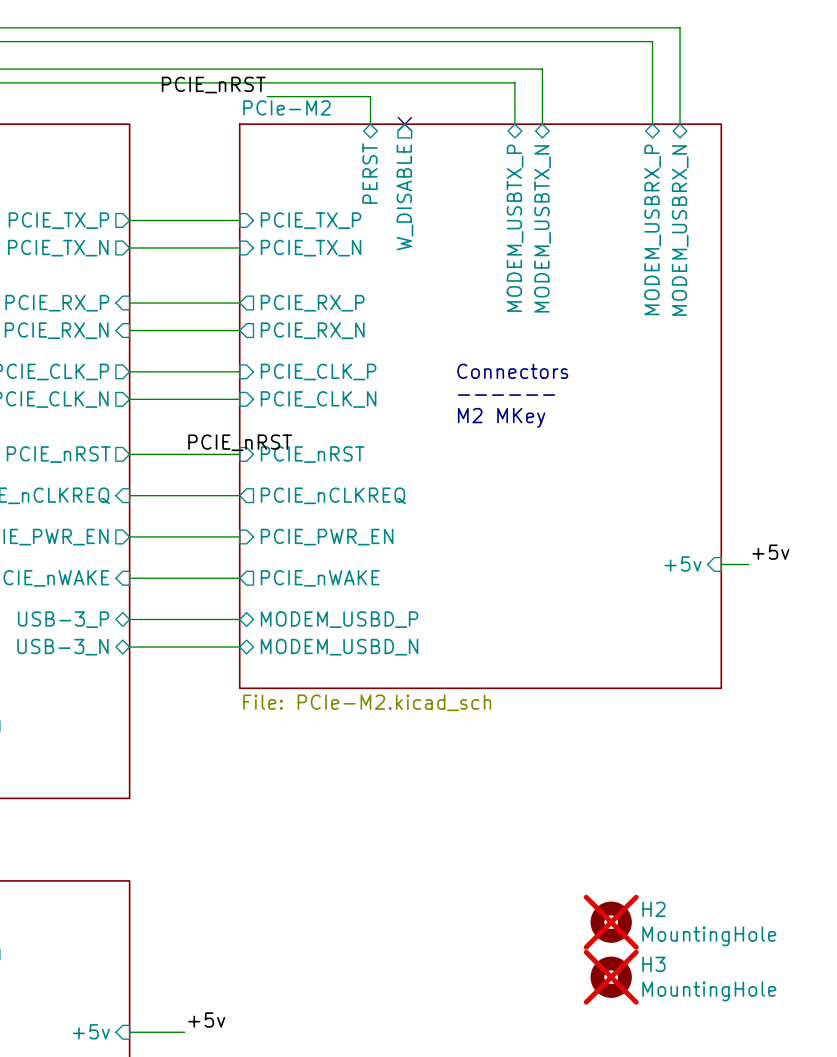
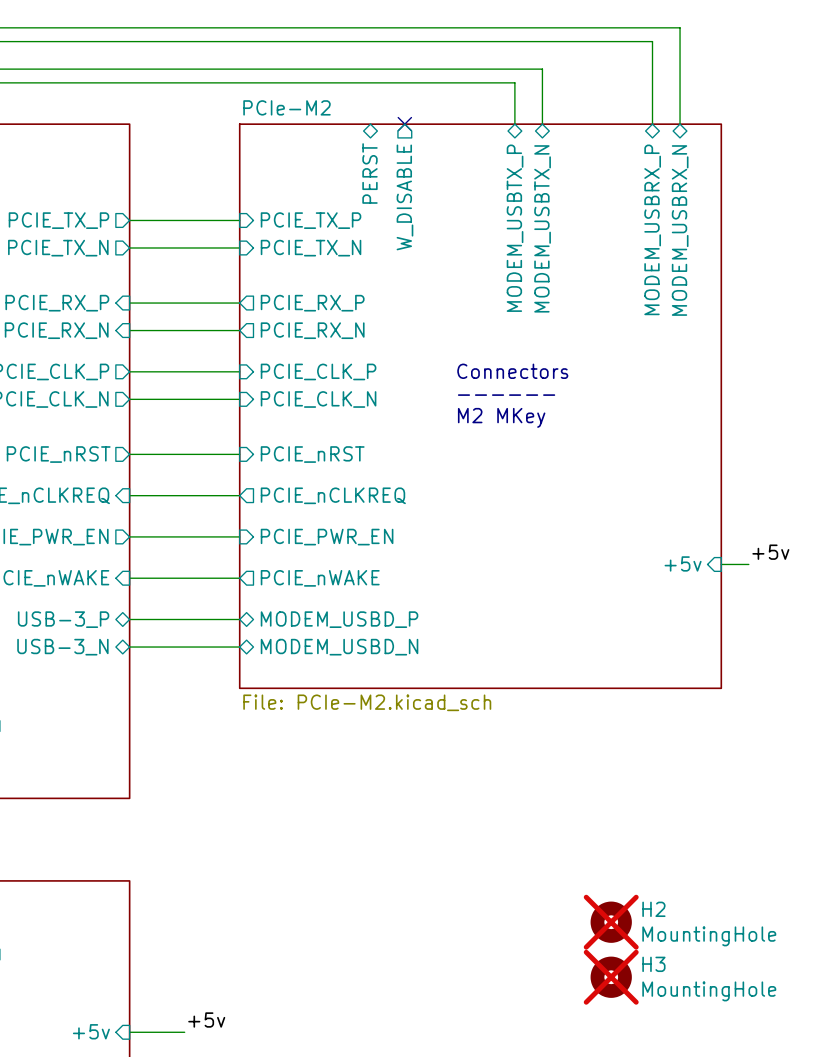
label: PCIE_nRST (213, 85) -> none
wire: (267, 96) (370, 96) (370, 124) -> none
label: PCIE_nRST (240, 442) -> none

